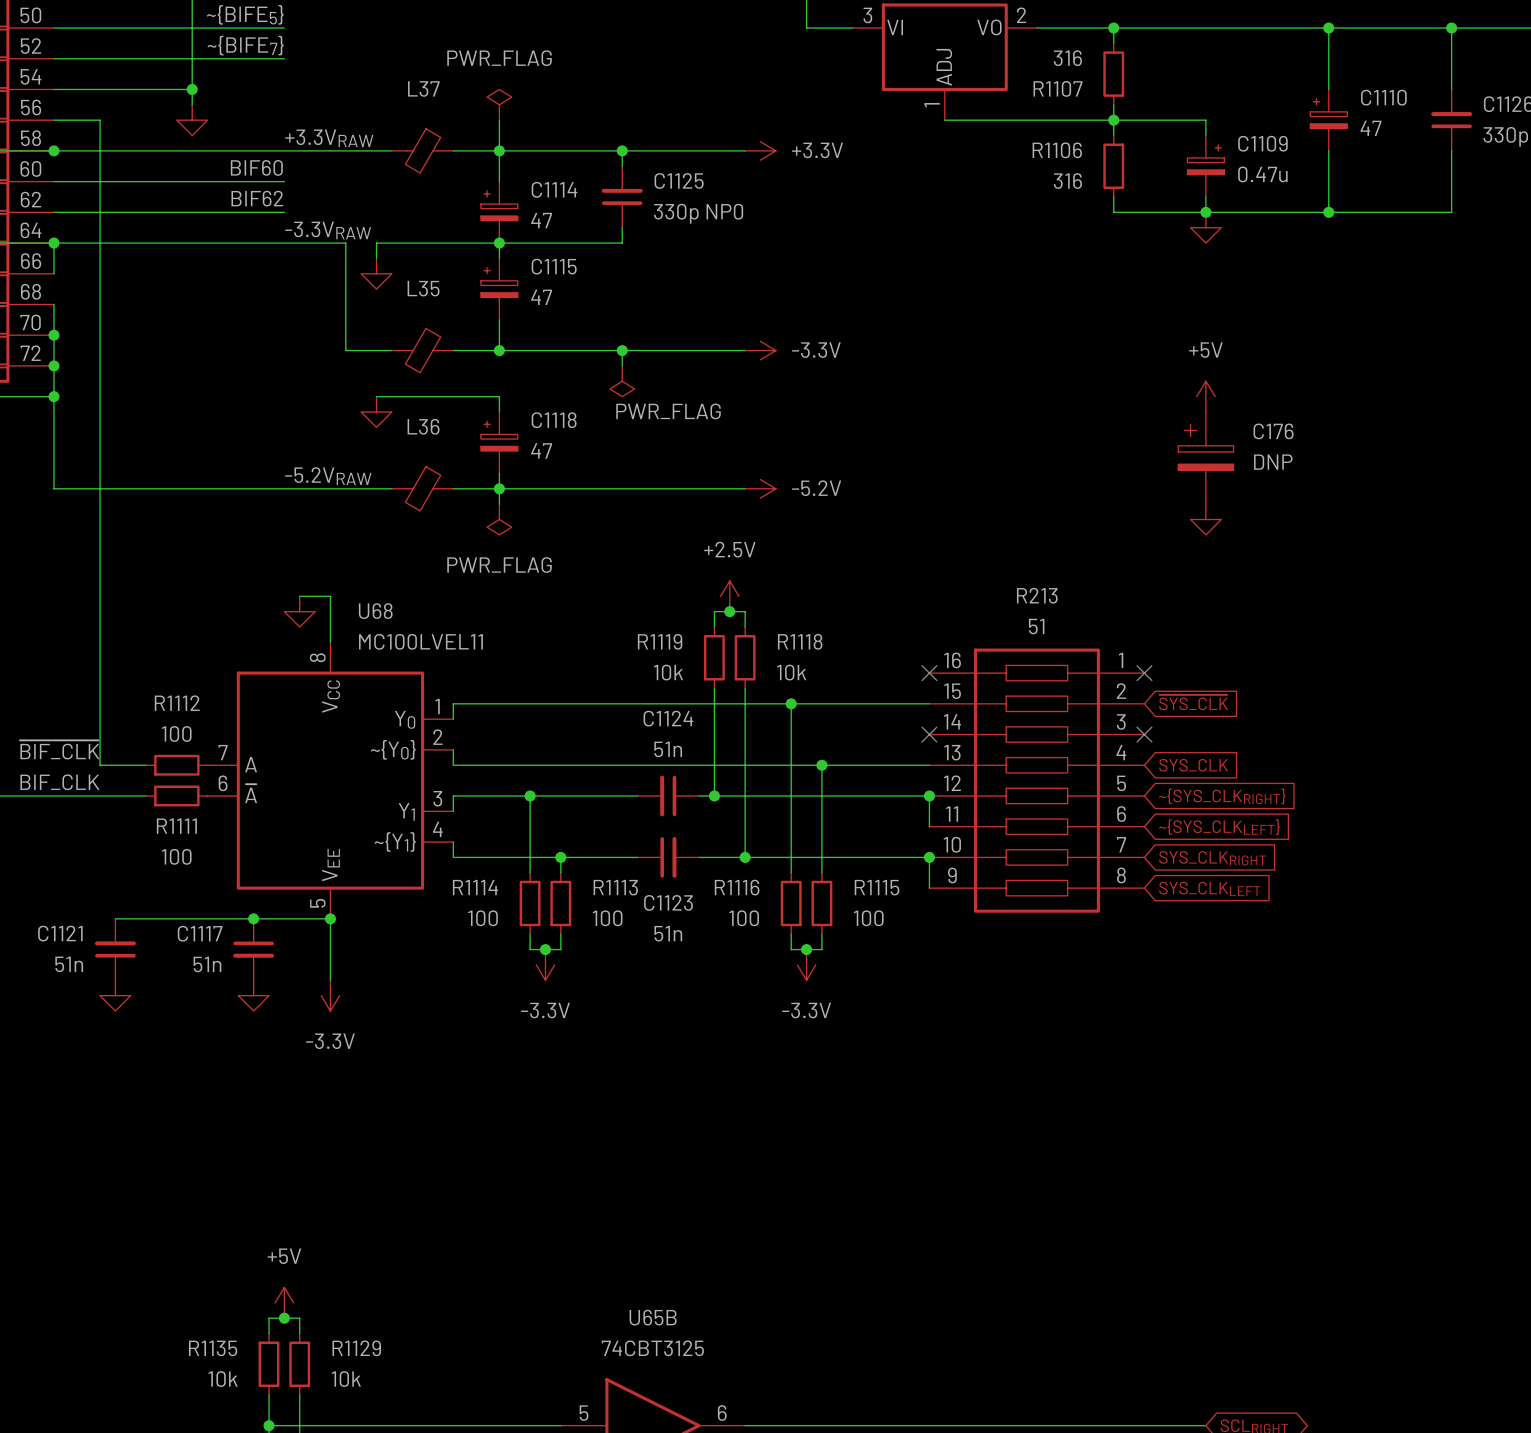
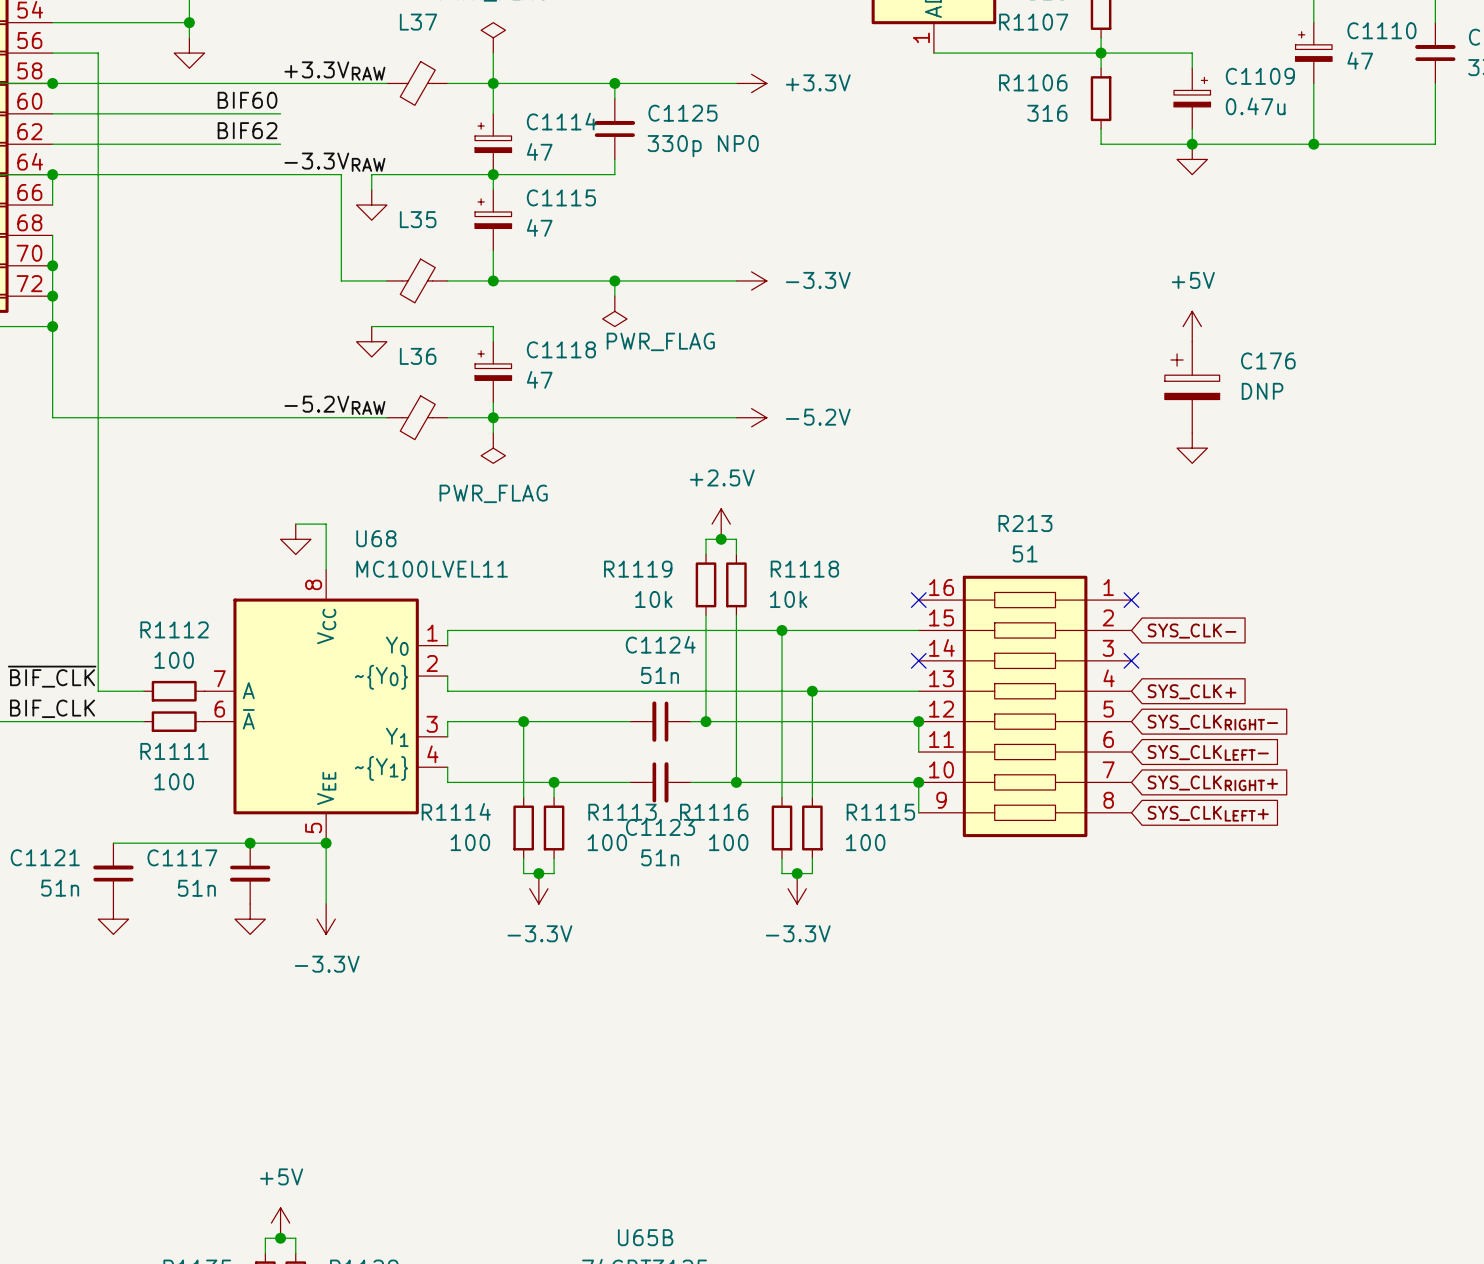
global label: ~{SYS_CLK} (1193, 702) -> SYS_CLK- (1192, 631)
global label: SYS_CLK (1193, 765) -> SYS_CLK+ (1192, 691)
global label: ~{SYS_CLKRIGHT} (1222, 796) -> SYS_CLKRIGHT- (1212, 722)
global label: ~{SYS_CLKLEFT} (1219, 827) -> SYS_CLKLEFT- (1208, 752)
global label: SYS_CLKRIGHT (1212, 858) -> SYS_CLKRIGHT+ (1212, 783)
global label: SYS_CLKLEFT (1209, 888) -> SYS_CLKLEFT+ (1208, 813)

